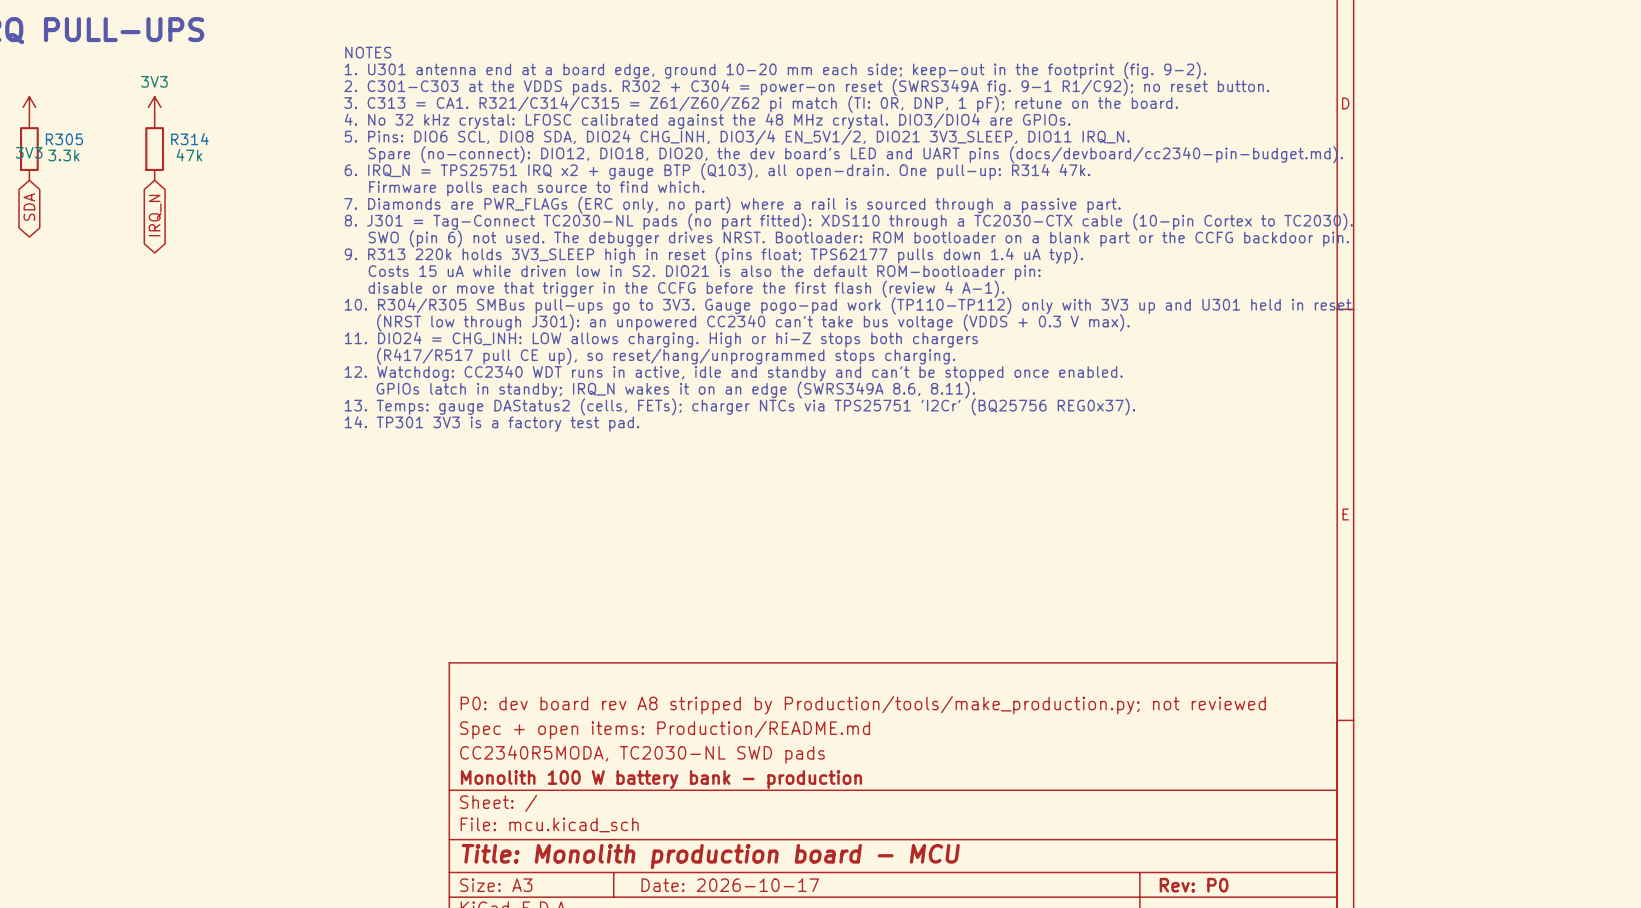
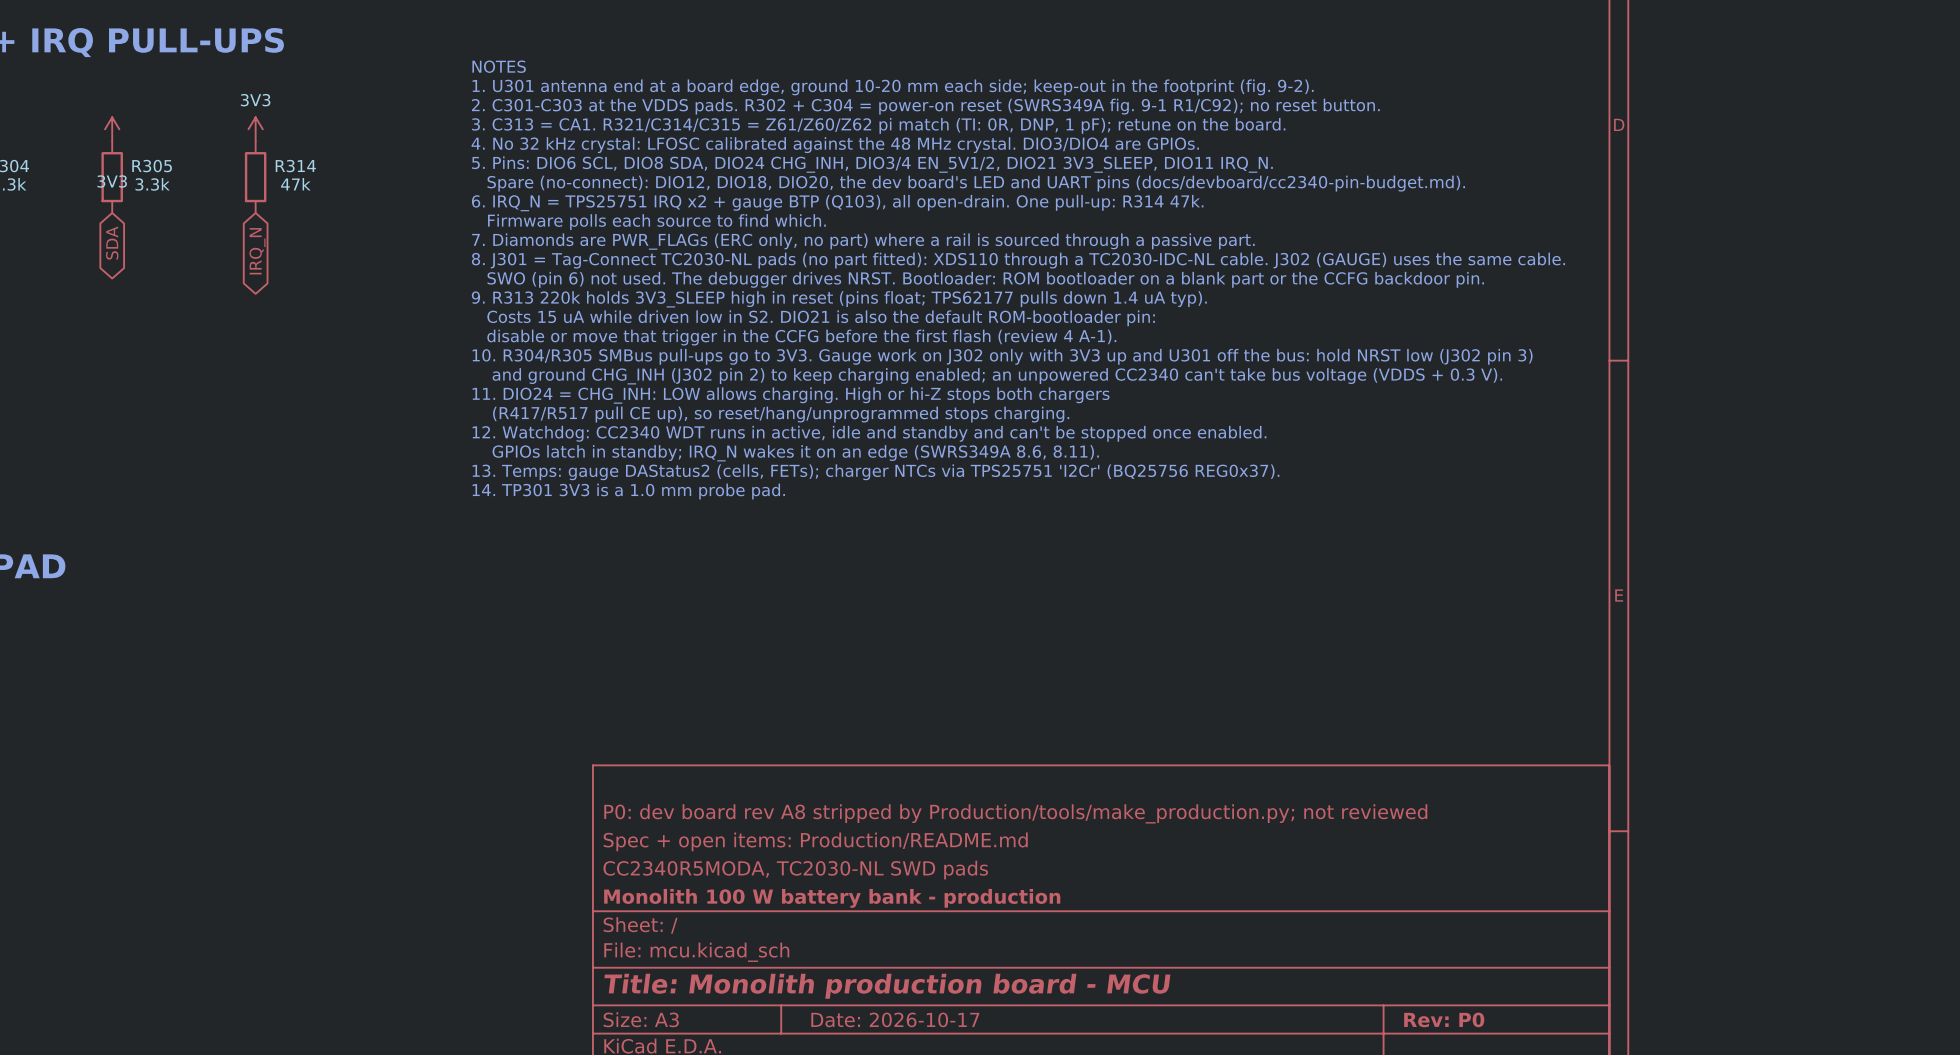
text: 8. J301 = Tag-Connect TC2030-NL pads (no part fitted): XDS110 through a TC2030-CTX cable (10-pin Cortex to TC2030). (848, 221) -> 8. J301 = Tag-Connect TC2030-NL pads (no part fitted): XDS110 through a TC2030-IDC-NL cable. J302 (GAUGE) uses the same cable. (1018, 260)
text: 10. R304/R305 SMBus pull-ups go to 3V3. Gauge pogo-pad work (TP110-TP112) only with 3V3 up and U301 held in reset (848, 305) -> 10. R304/R305 SMBus pull-ups go to 3V3. Gauge work on J302 only with 3V3 up and U301 off the bus: hold NRST low (J302 pin 3) (1002, 356)
text: (NRST low through J301): an unpowered CC2340 can't take bus voltage (VDDS + 0.3 V max). (753, 322) -> and ground CHG_INH (J302 pin 2) to keep charging enabled; an unpowered CC2340 can't take bus voltage (VDDS + 0.3 V). (997, 376)
text: 14. TP301 3V3 is a factory test pad. (492, 423) -> 14. TP301 3V3 is a 1.0 mm probe pad. (628, 491)

